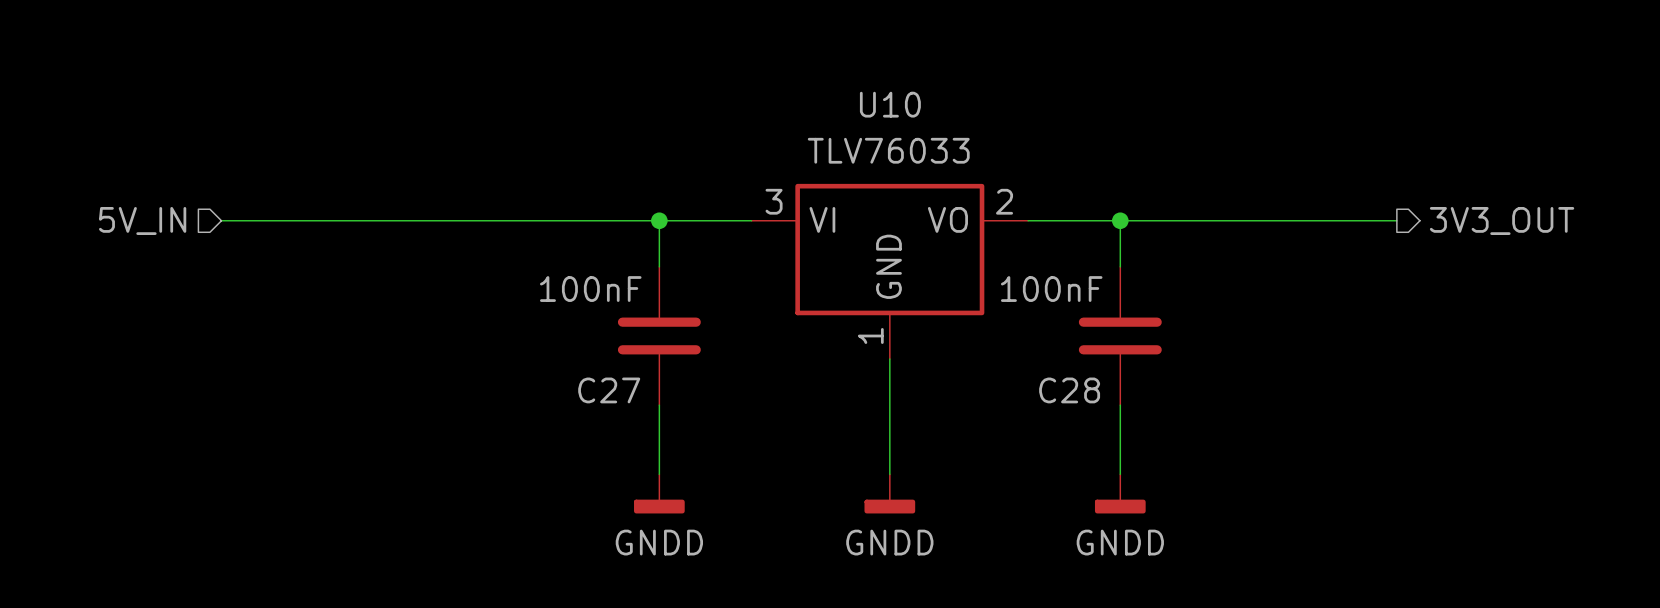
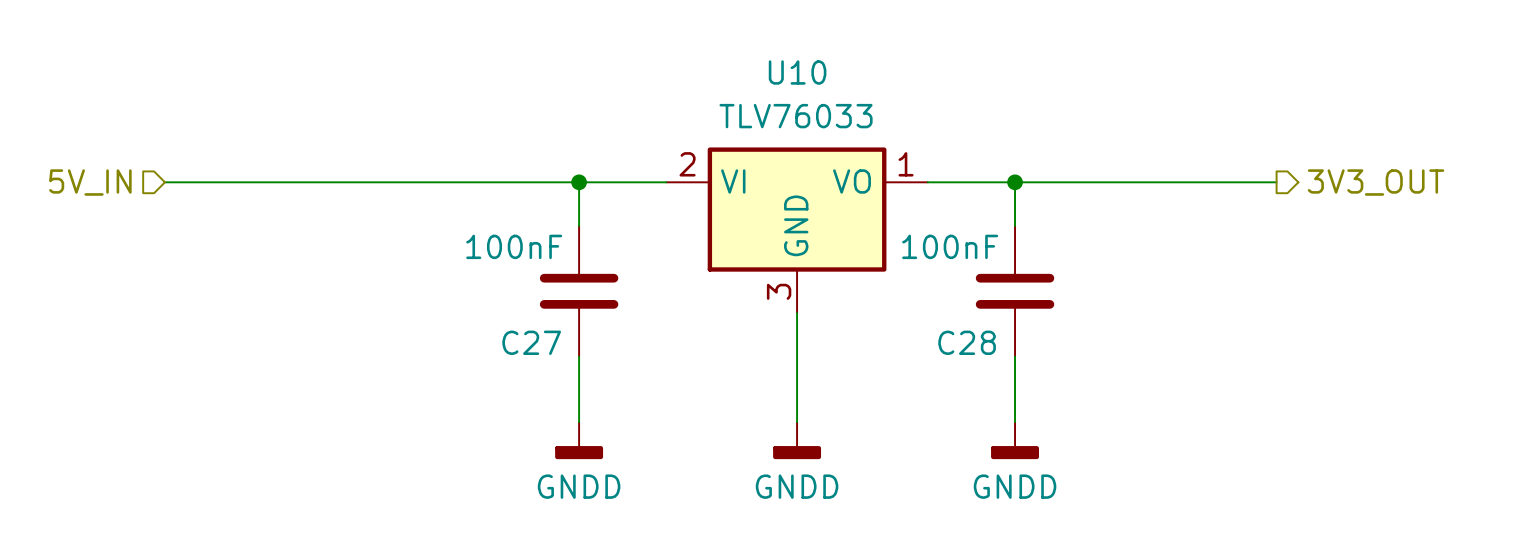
U10 pin number: 3 (774, 201) -> 2 (687, 164)
U10 pin number: 2 (1004, 201) -> 1 (906, 164)
U10 pin number: 1 (870, 335) -> 3 (779, 291)

